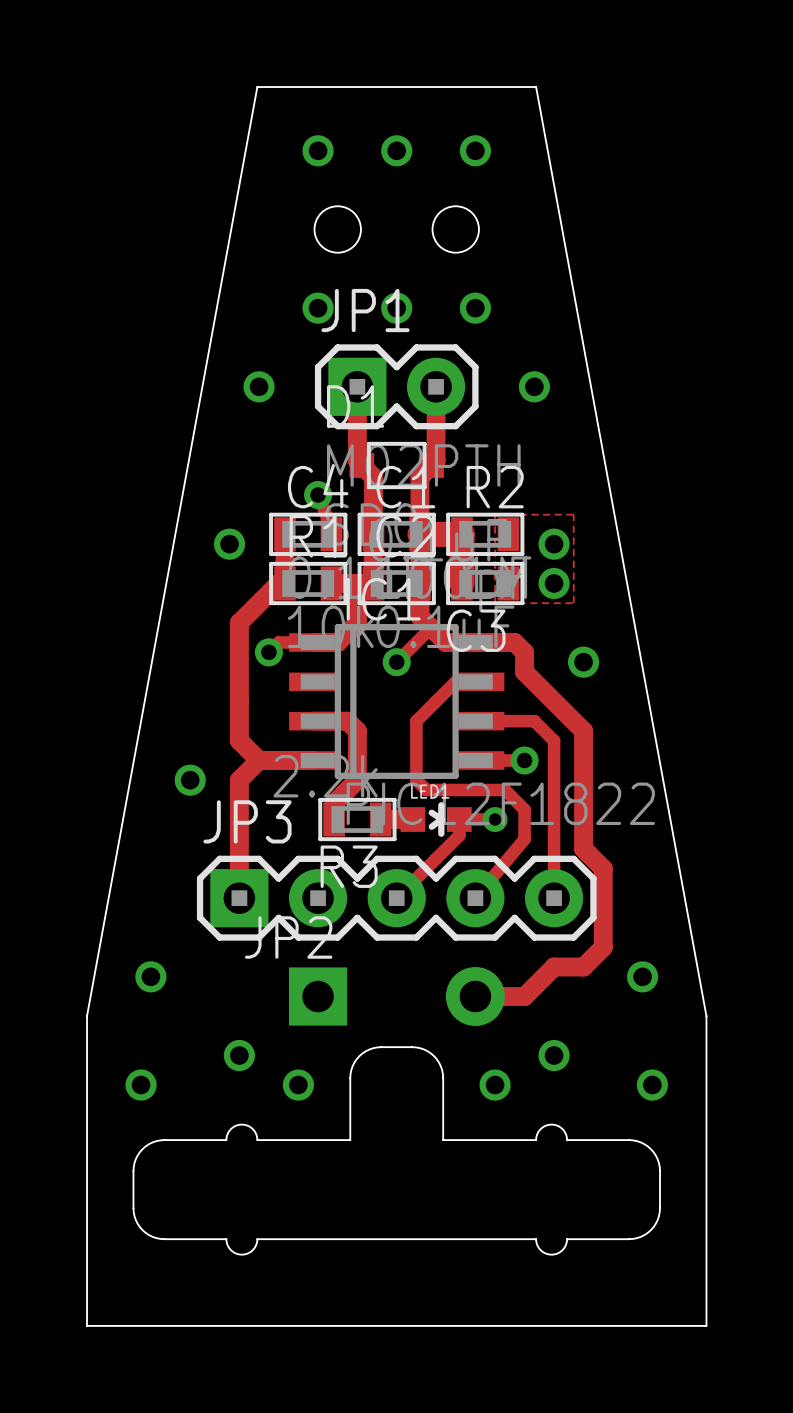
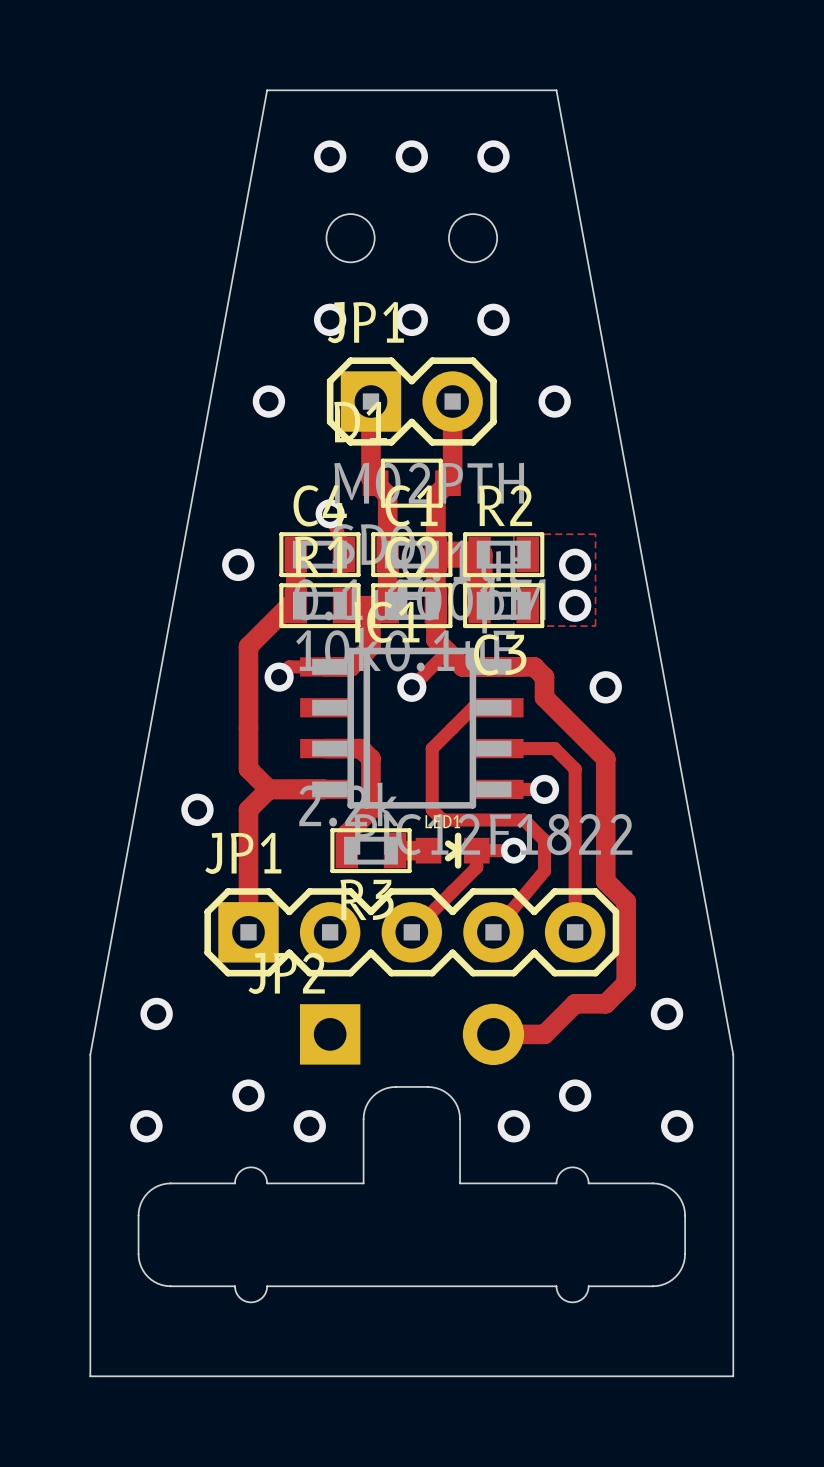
JP3 name: JP3 (247, 821) -> JP1 (243, 853)

